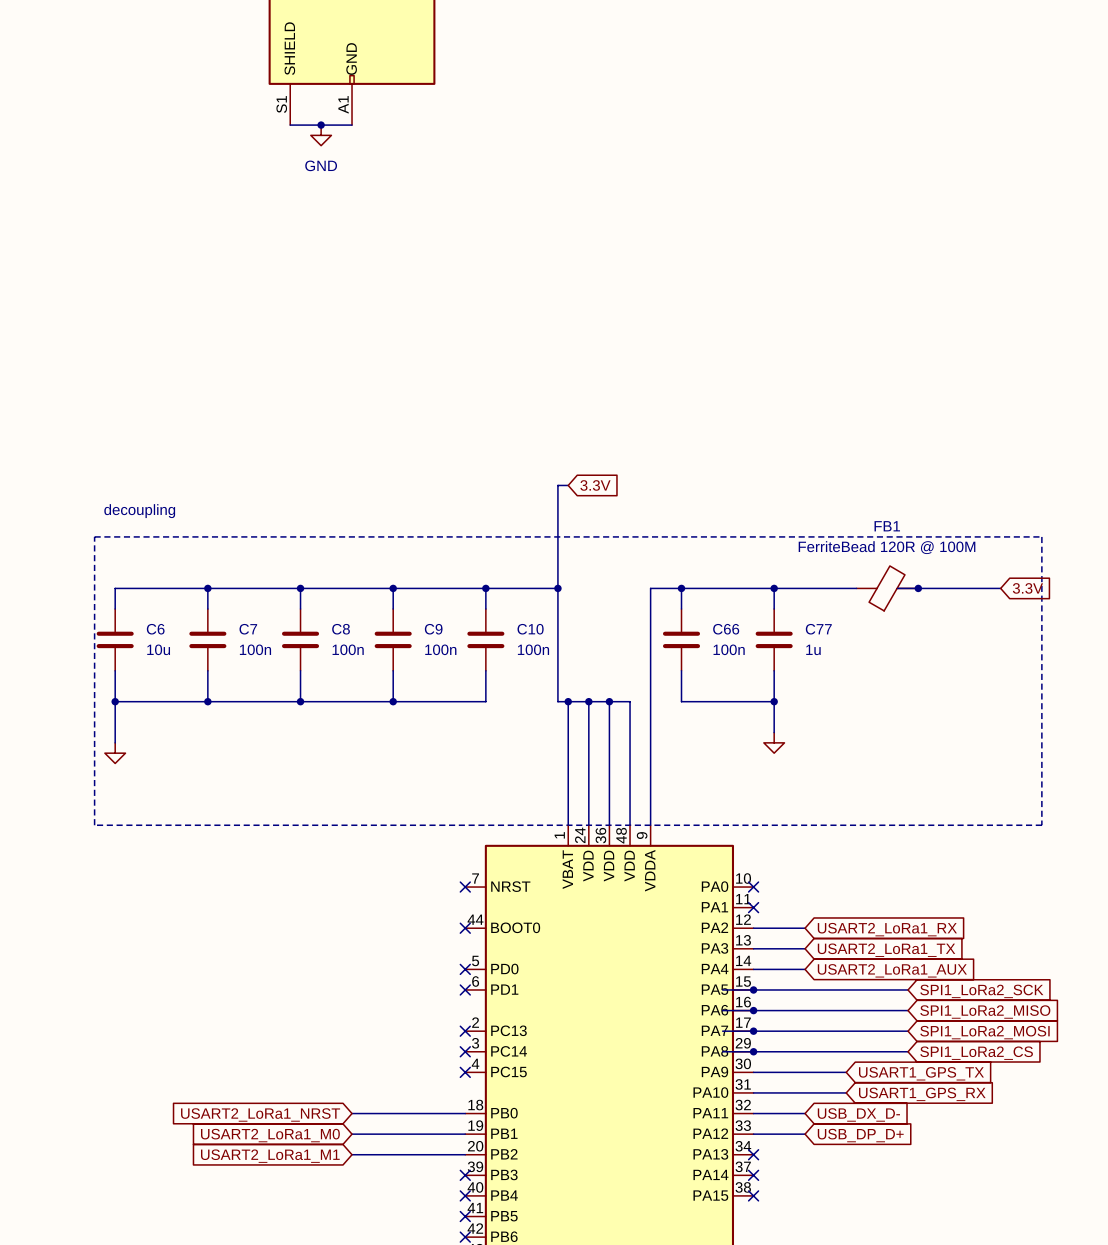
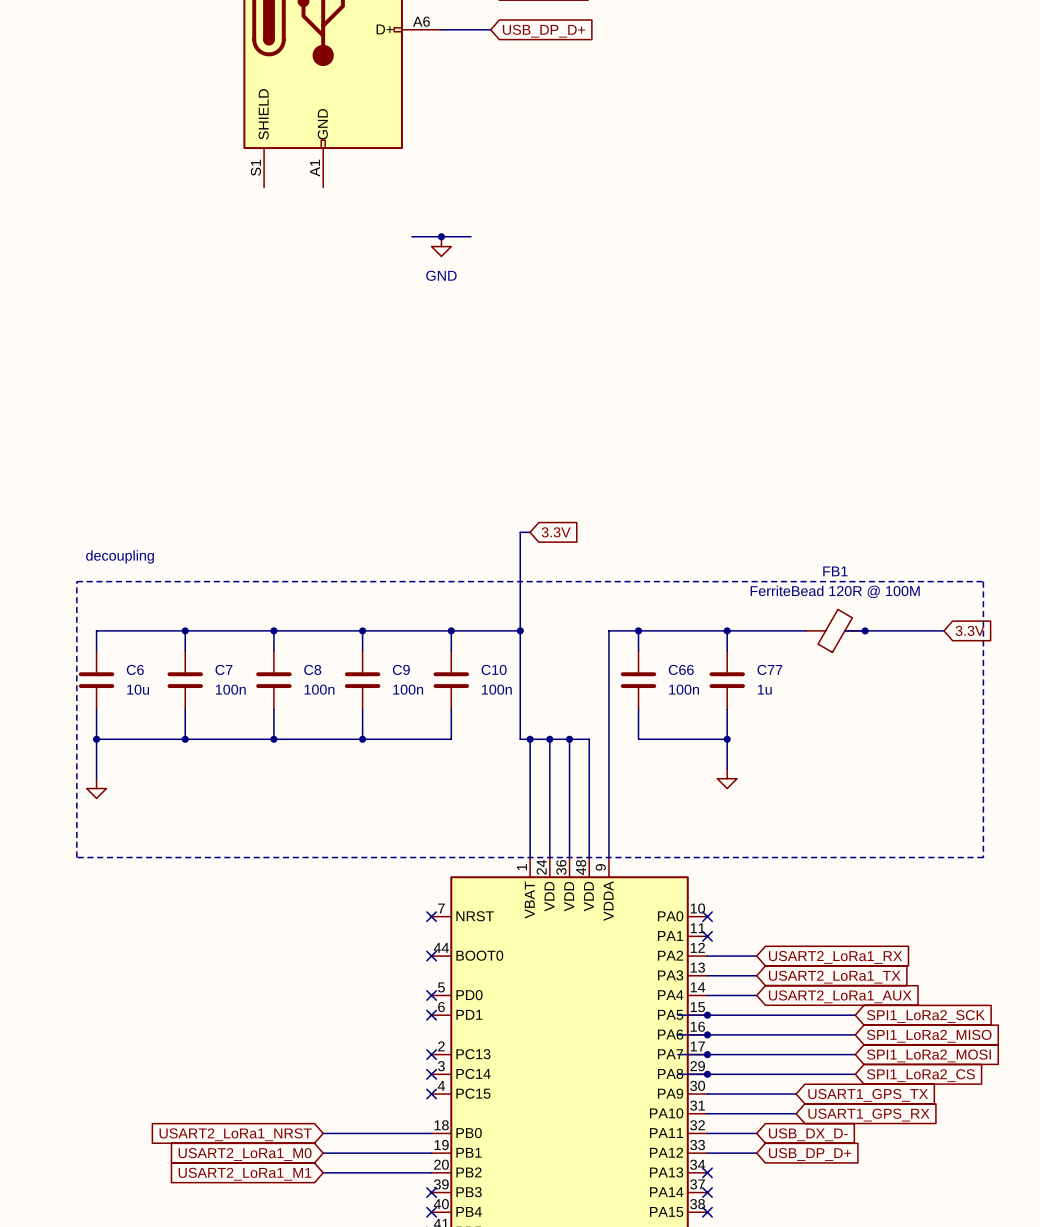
wire: (290, 125) (352, 125) -> (411, 236) (471, 236)
junction: (321, 125) -> none
power symbol position: GND (321, 135) -> GND (441, 246)
junction: none -> (441, 236)

